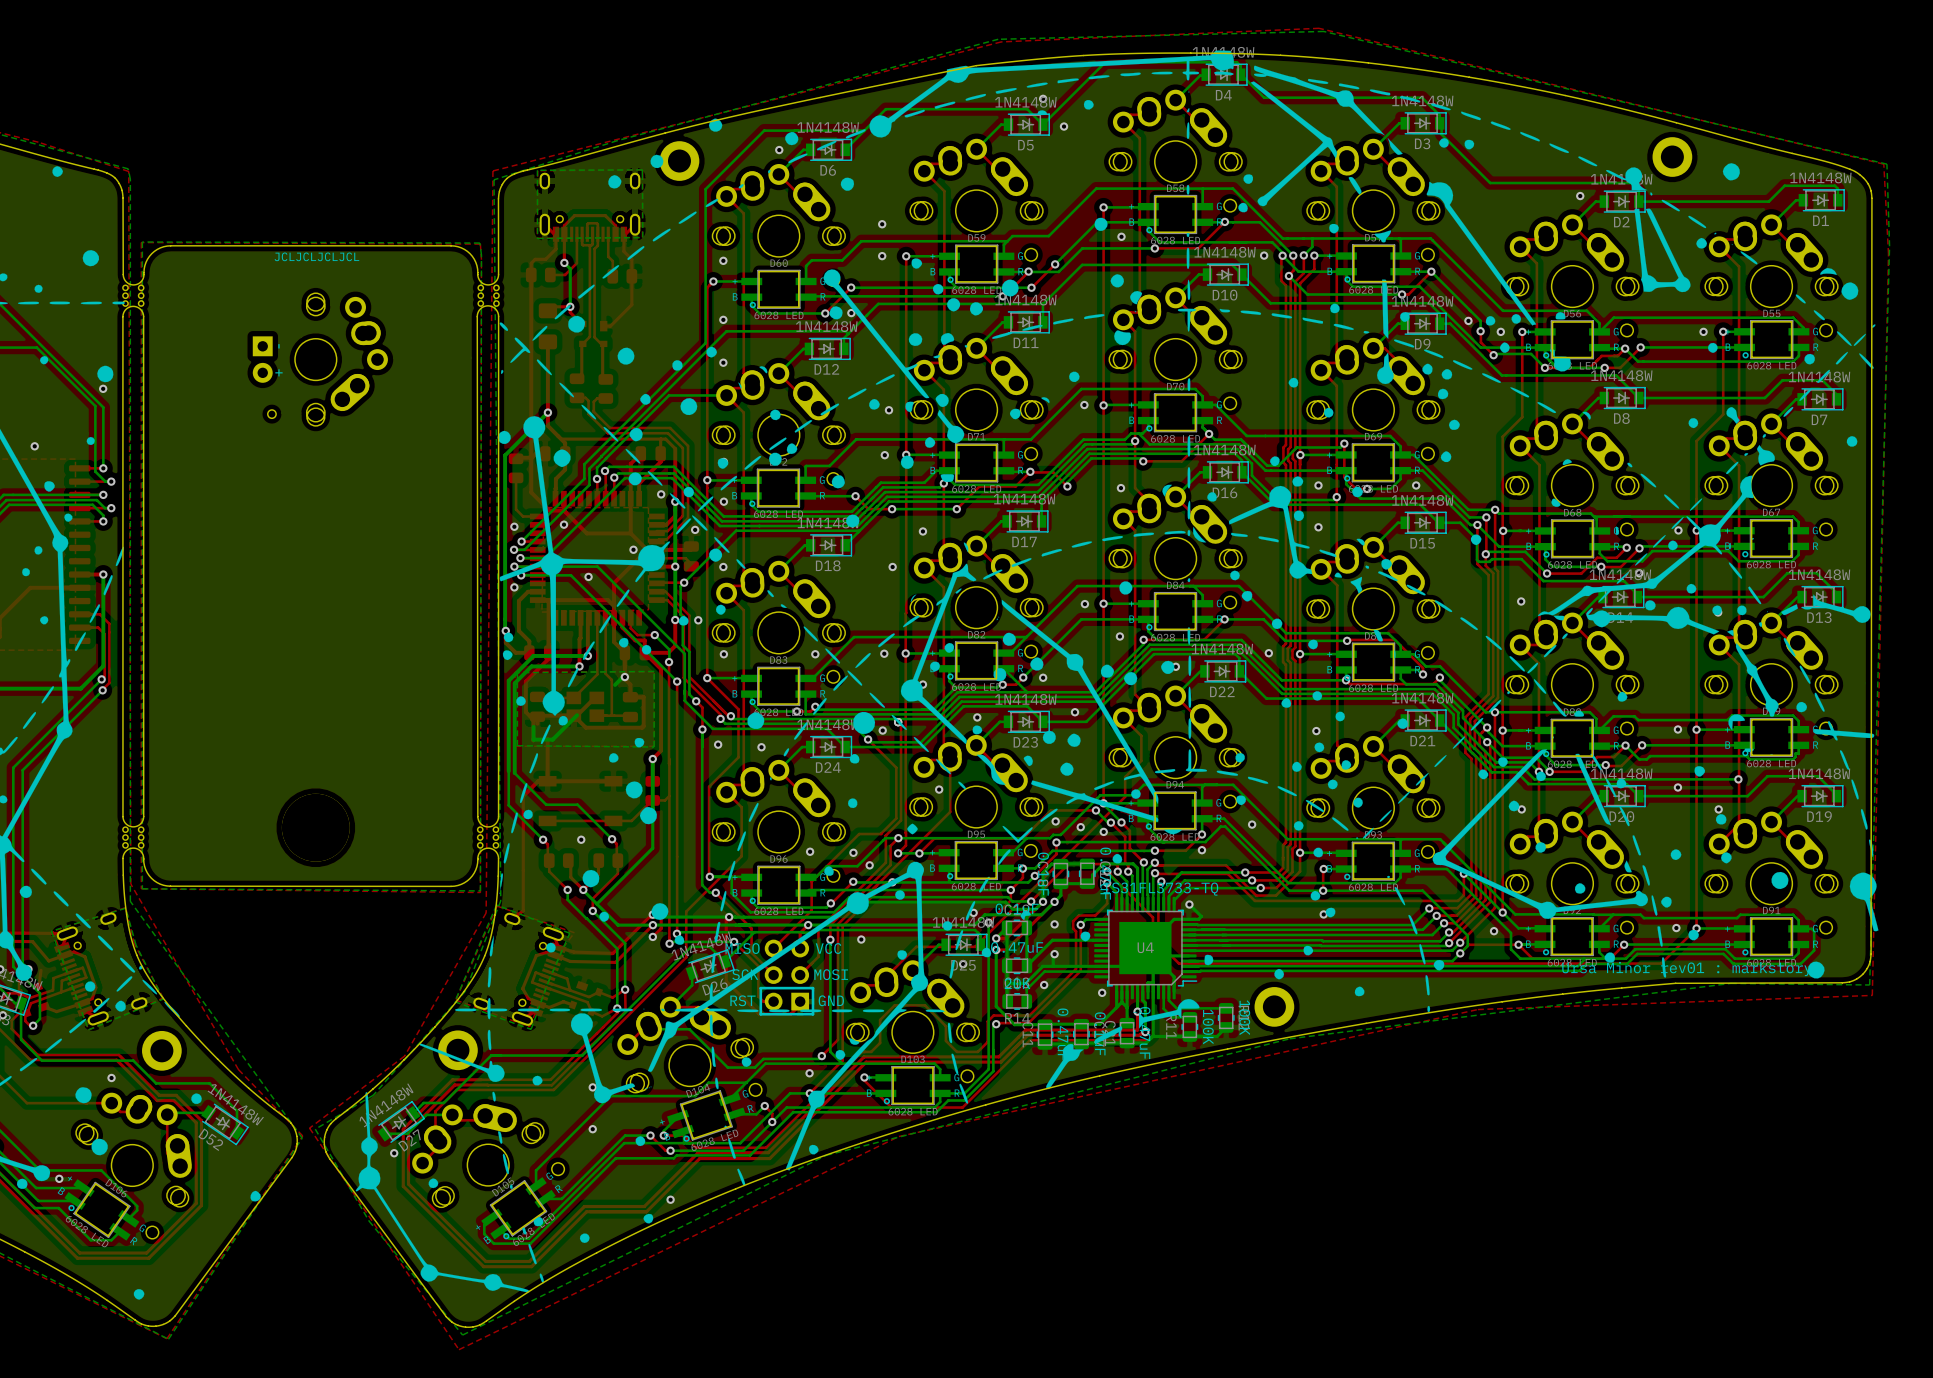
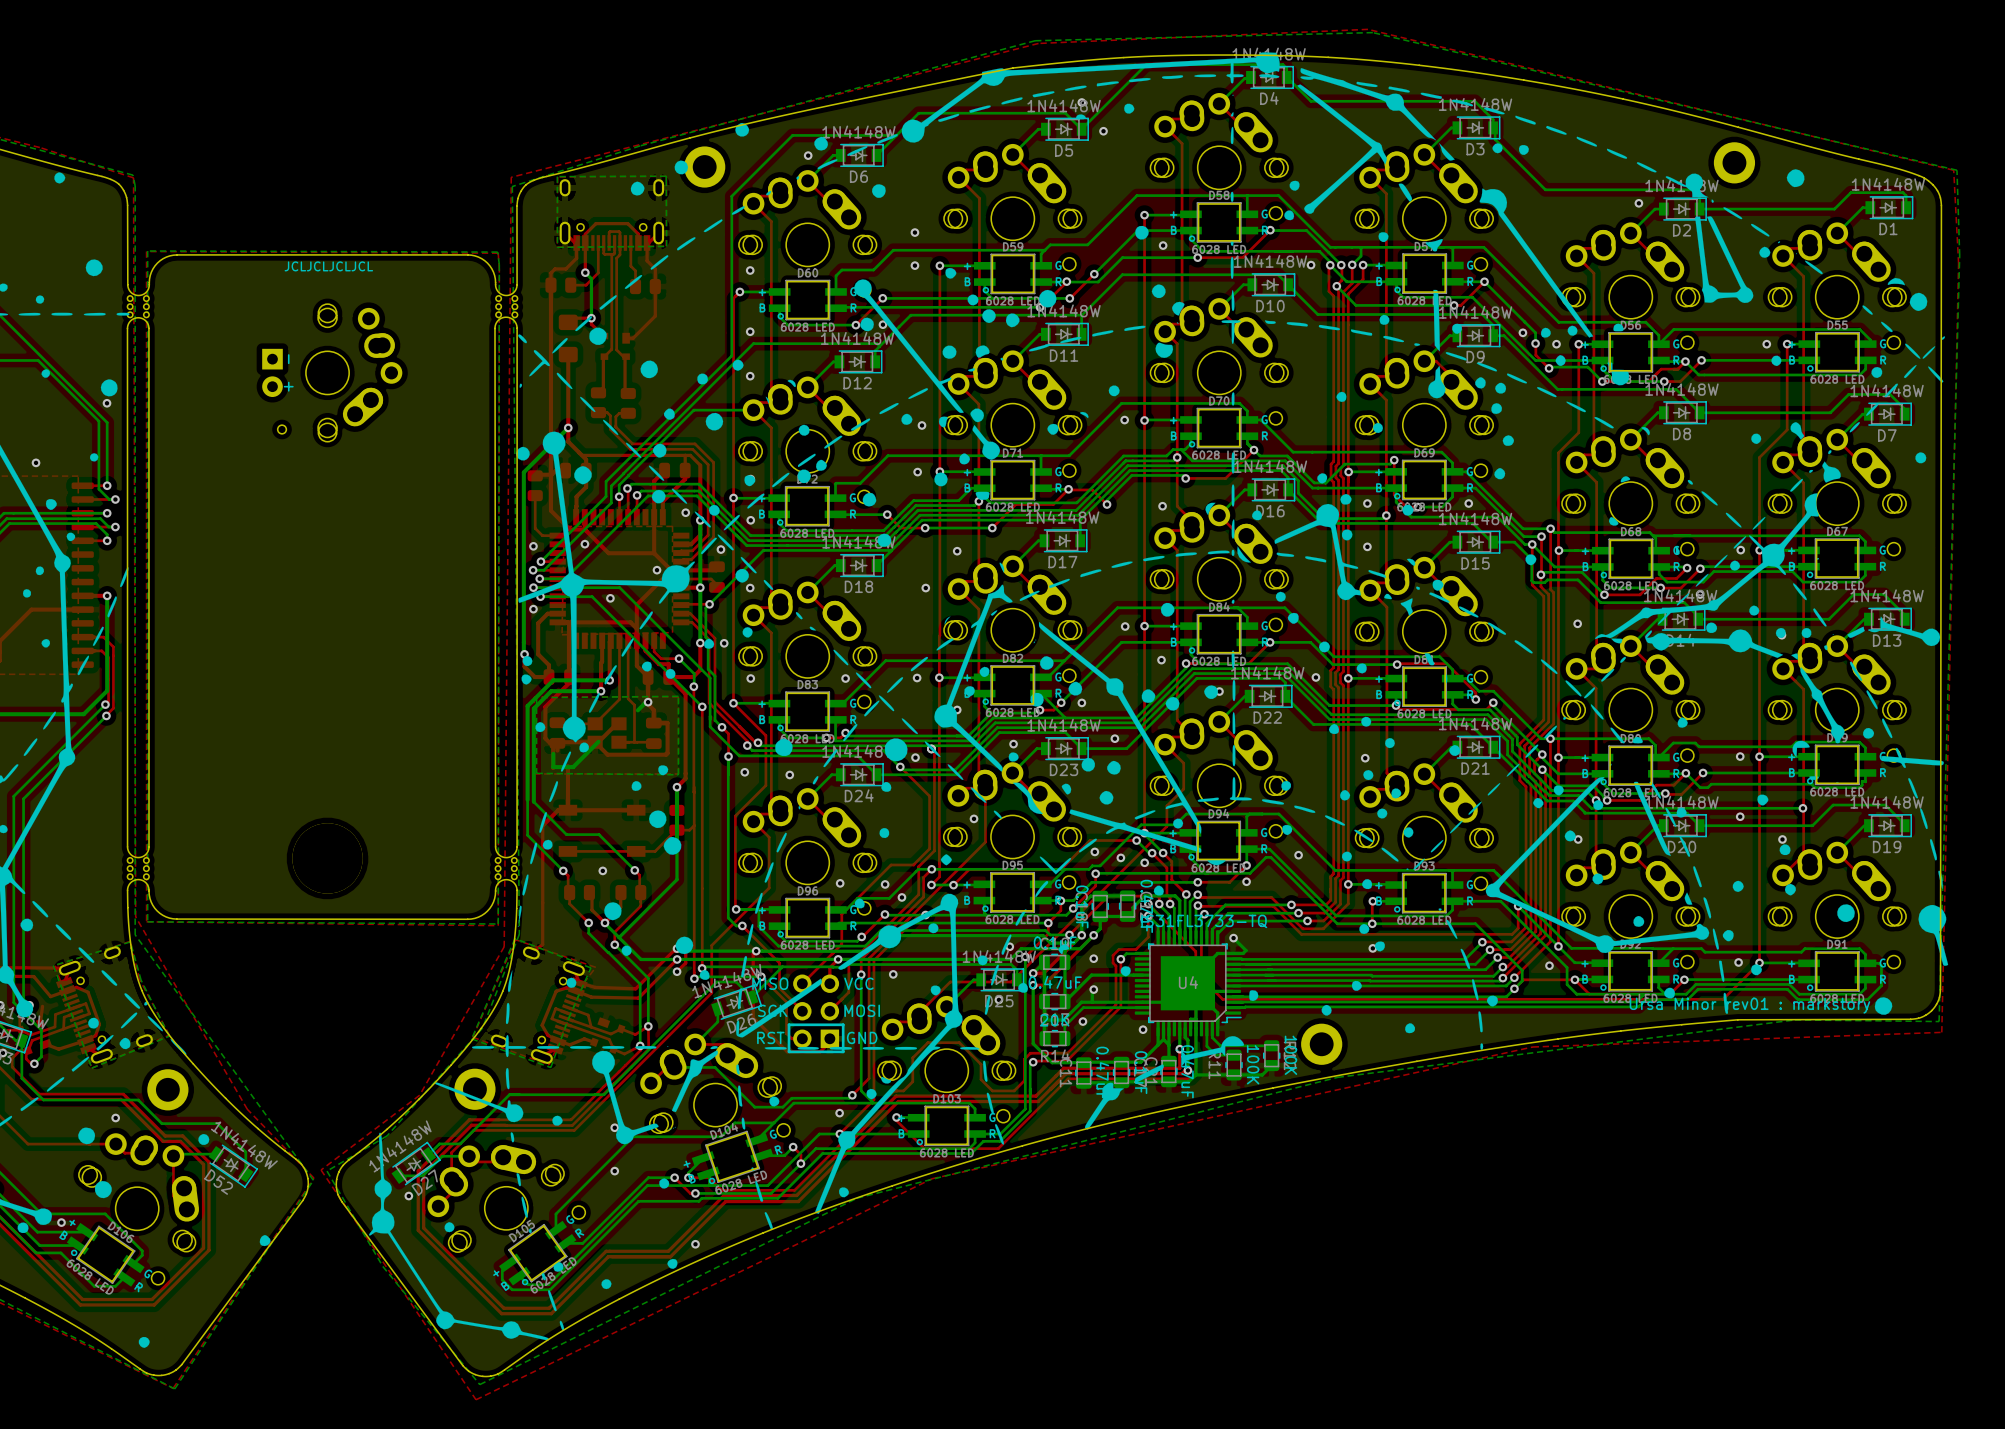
drawing shape: [355, 50, 1879, 1293] -> [368, 52, 1949, 1341]

